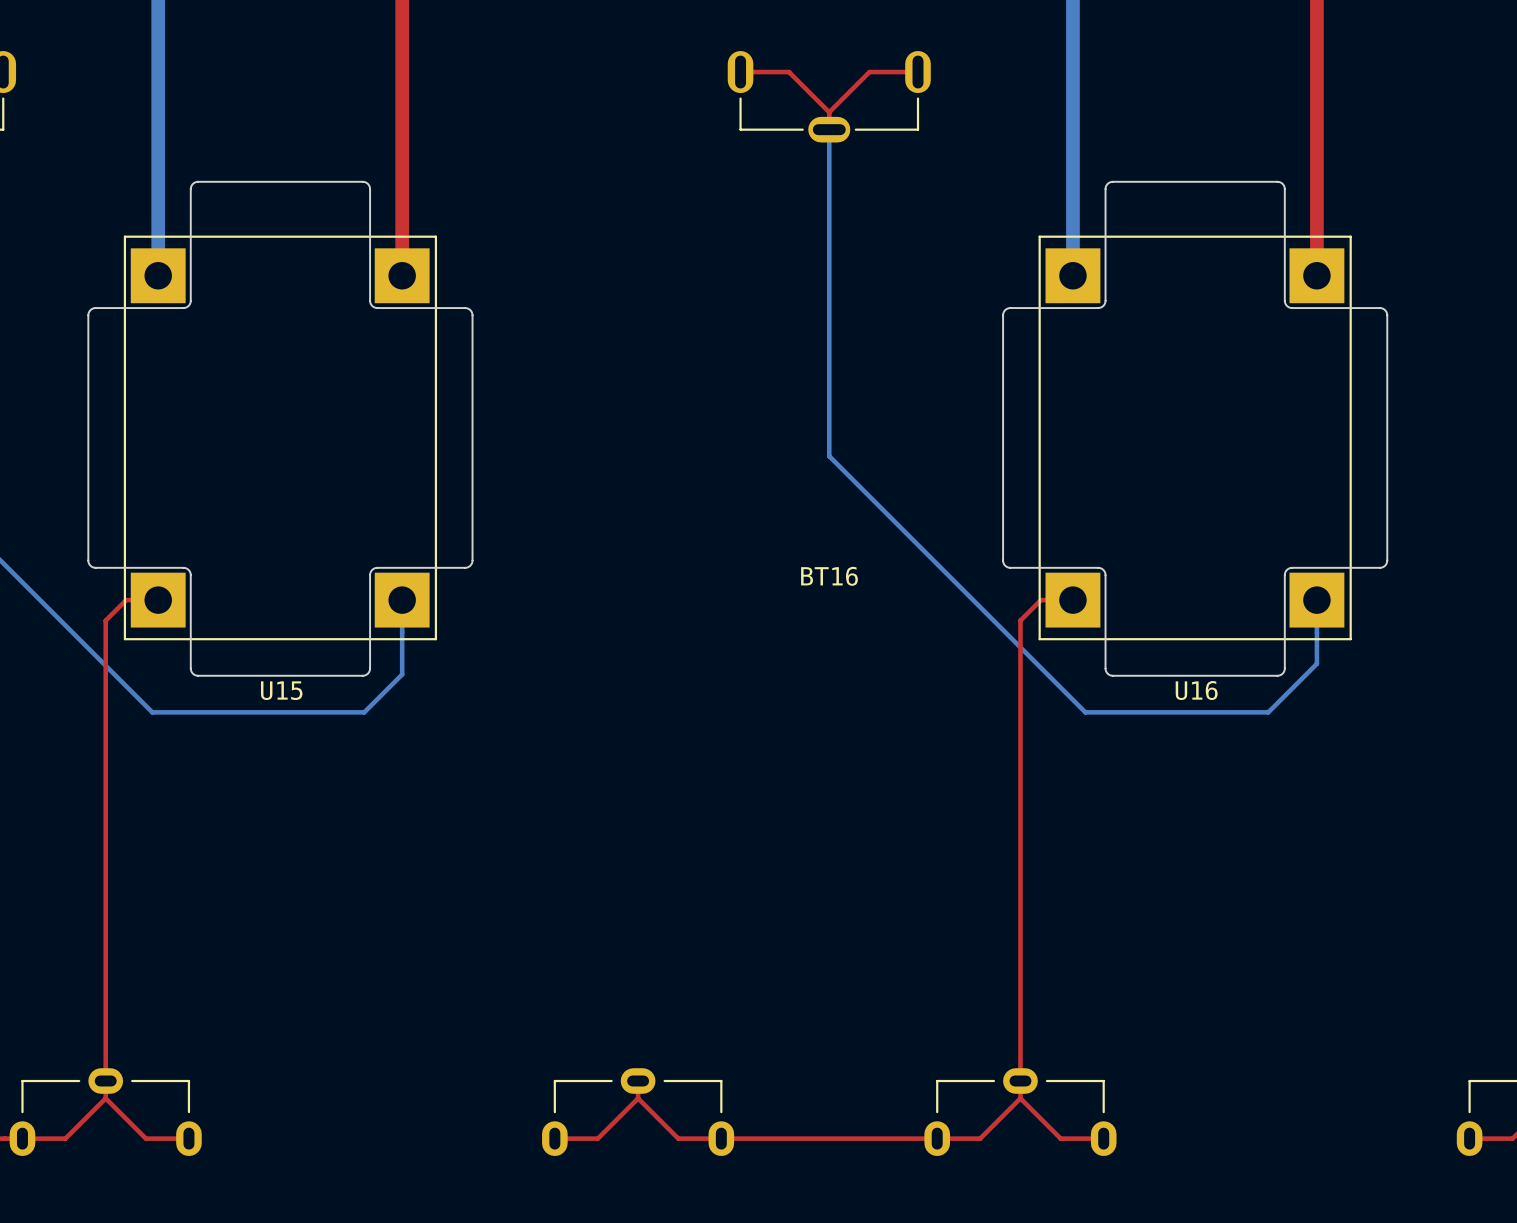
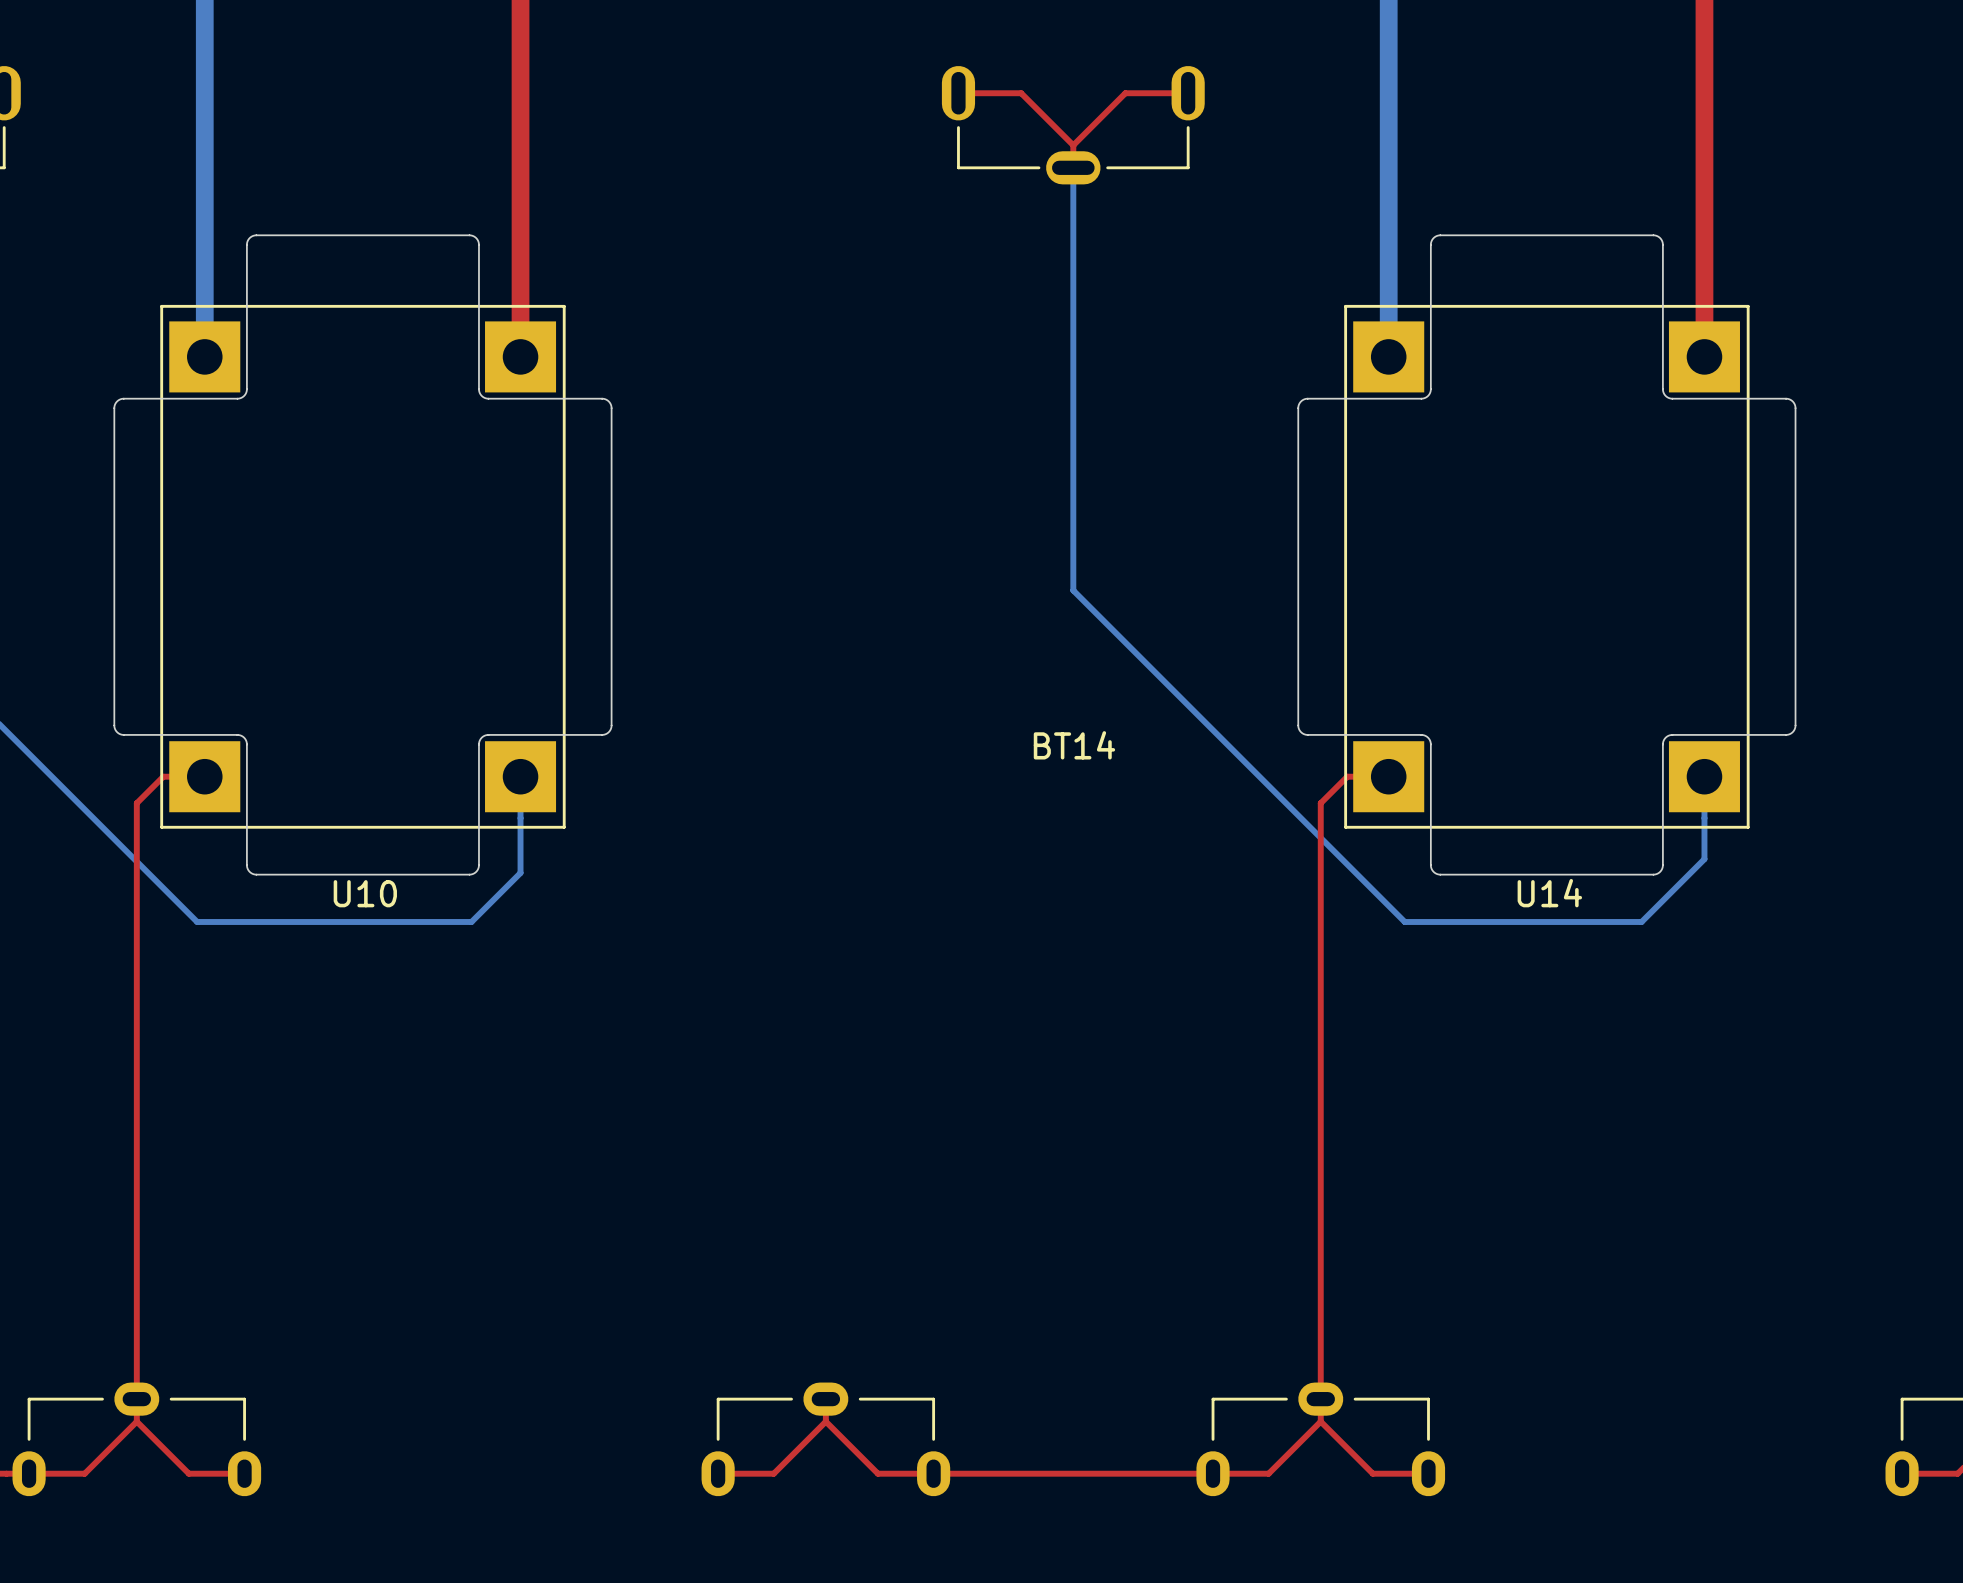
BT16 name: BT16 (829, 576) -> BT14 (1074, 745)
U15 name: U15 (281, 690) -> U10 (365, 893)
U16 name: U16 (1196, 690) -> U14 (1549, 893)

